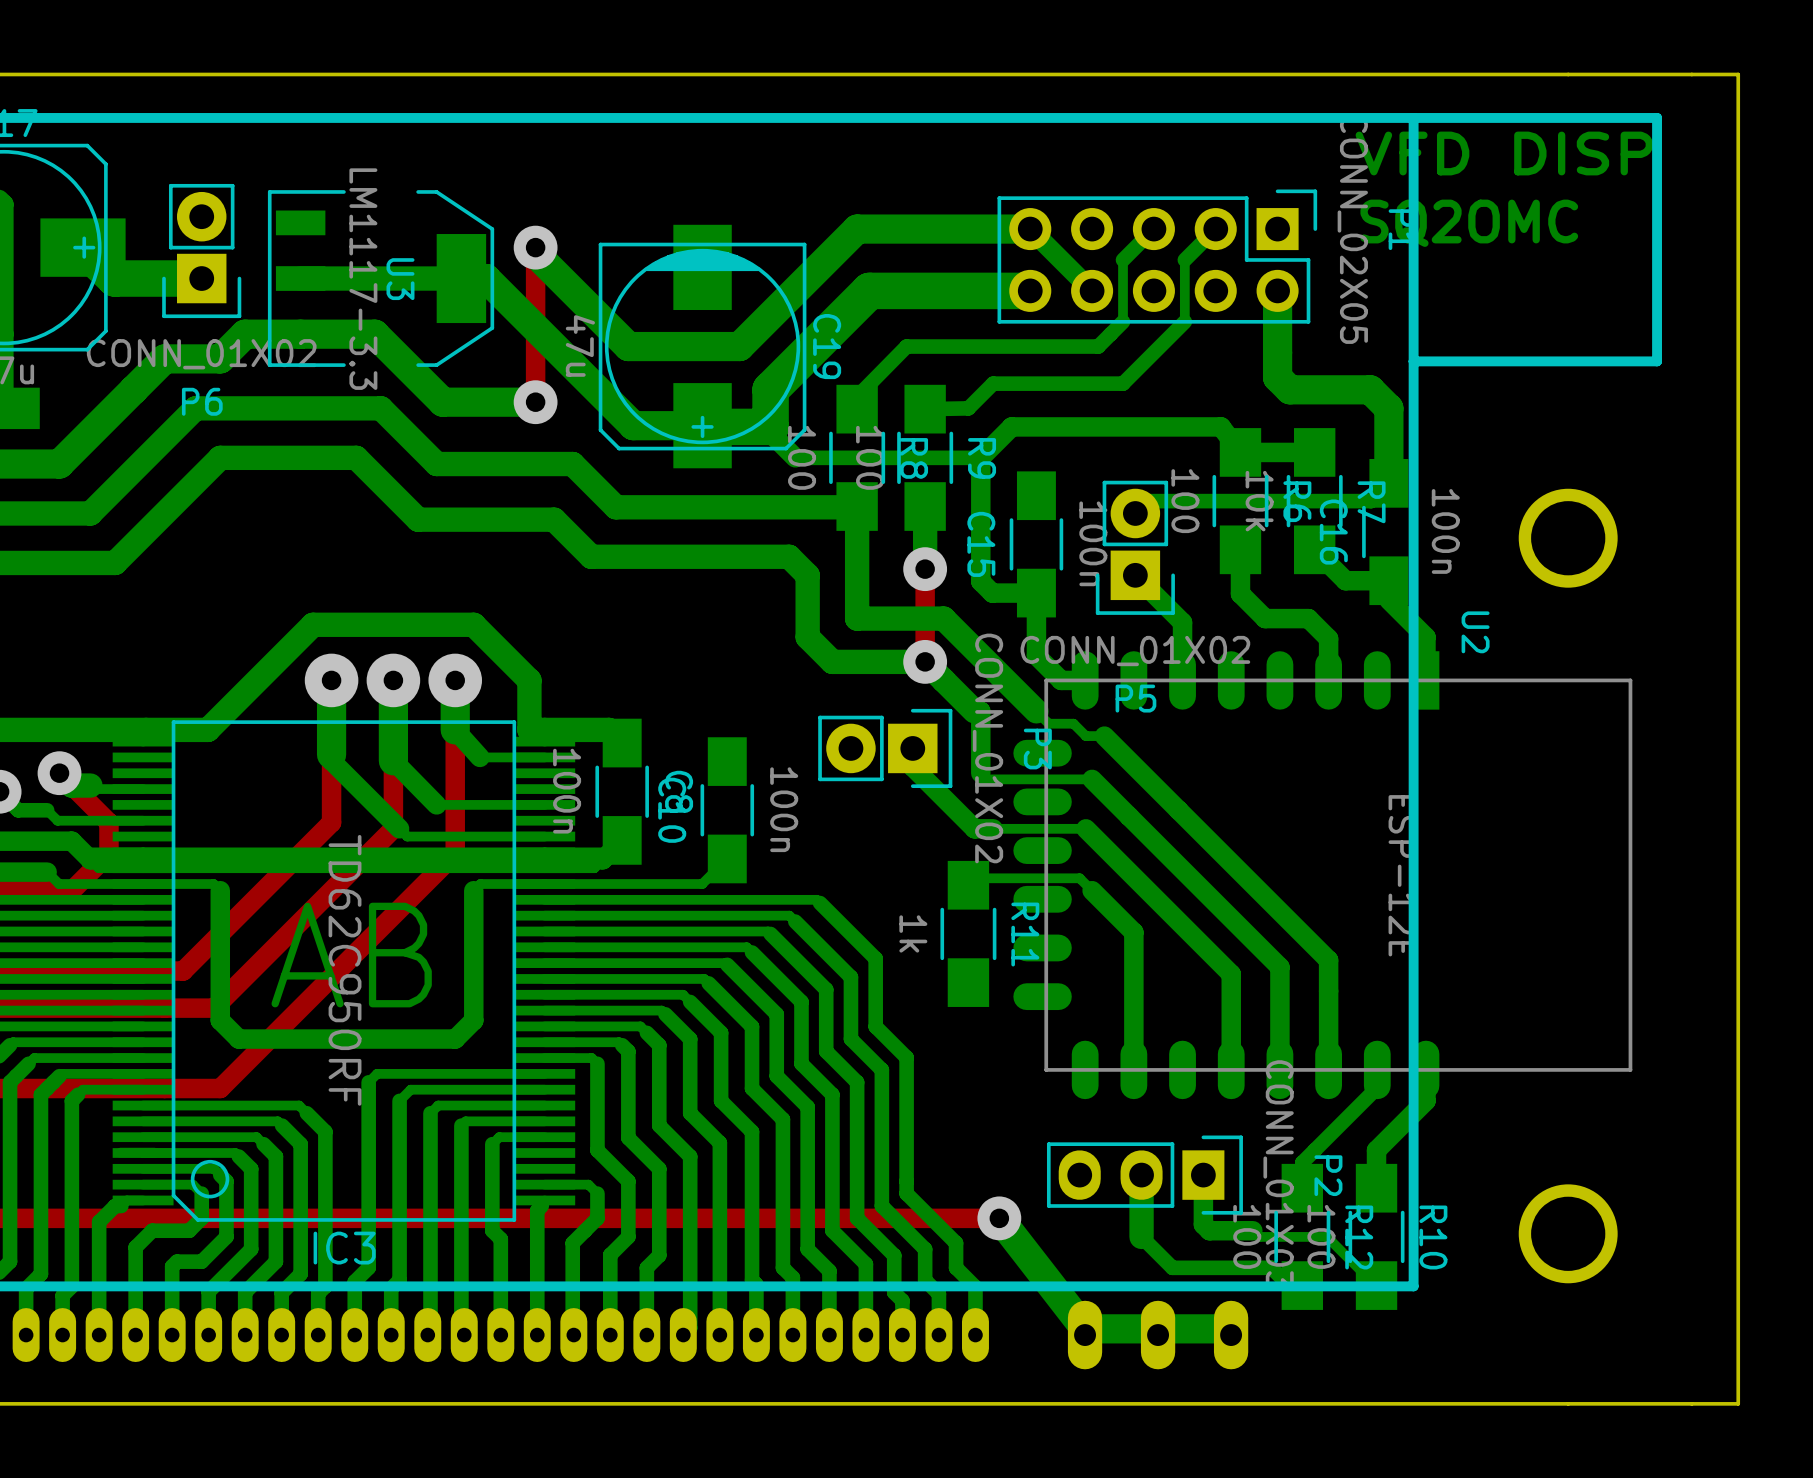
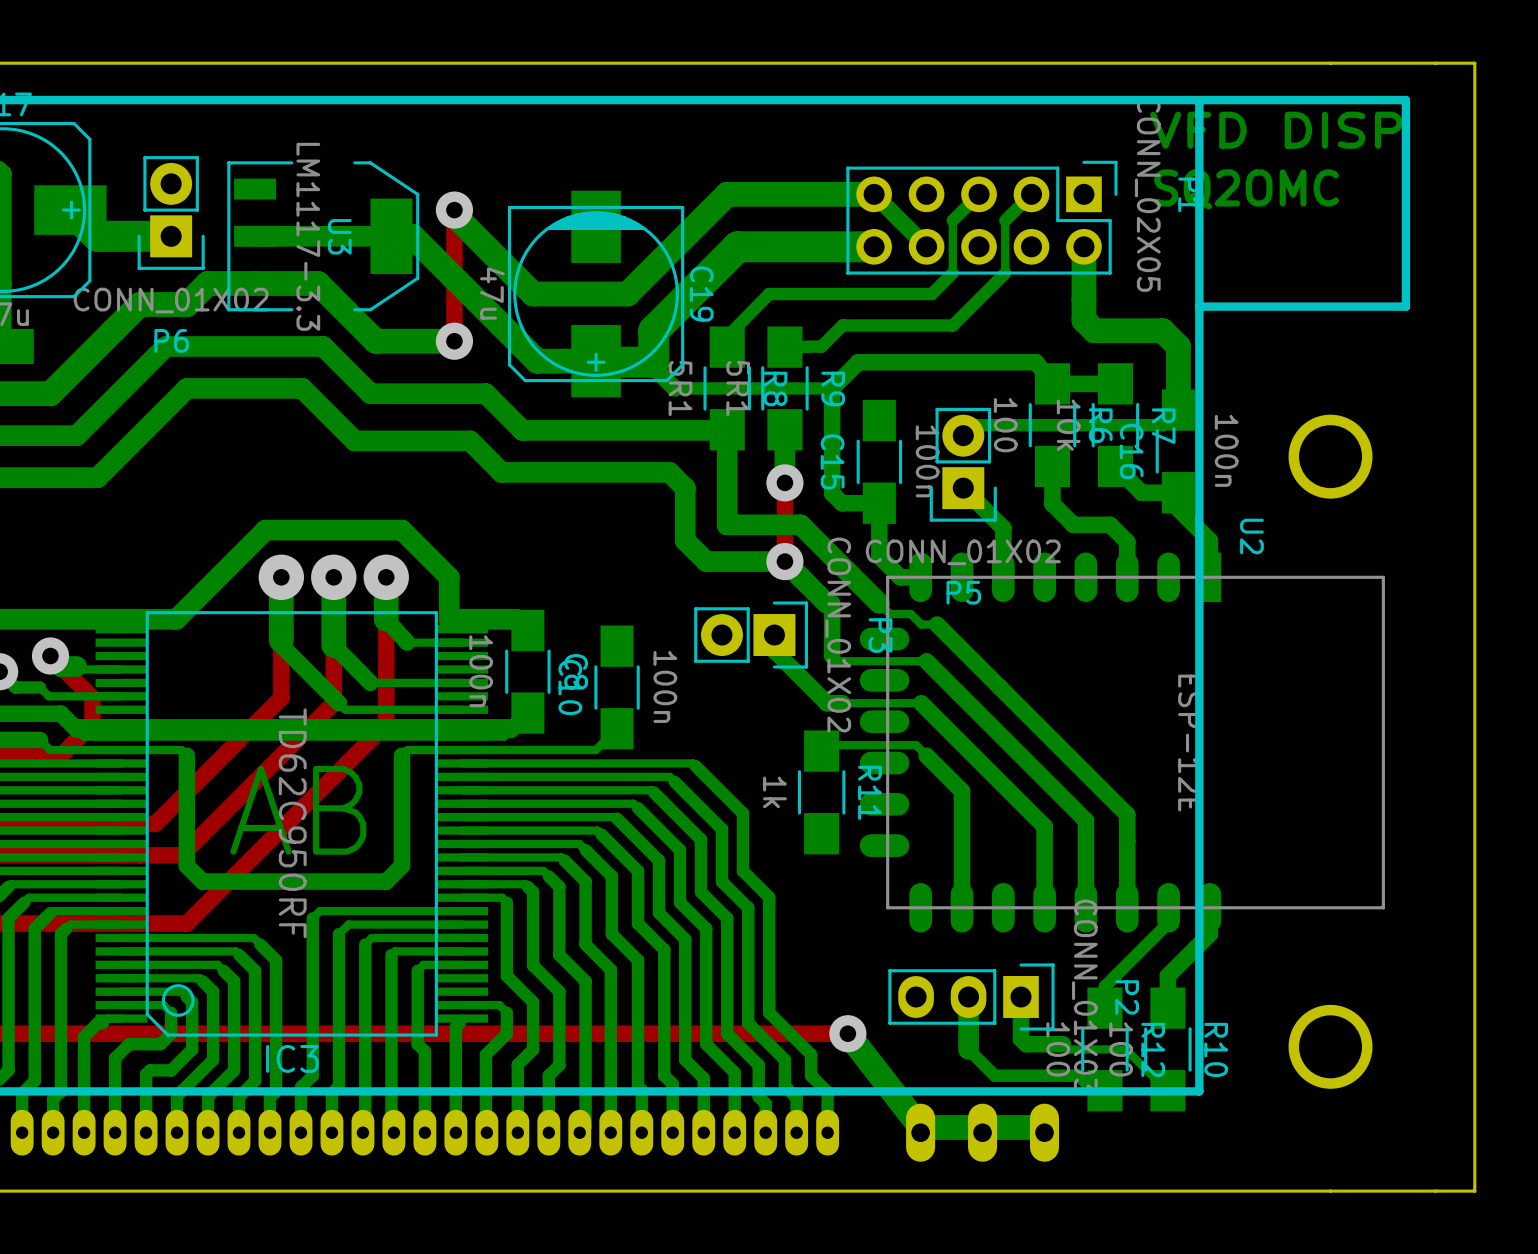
R8 value: 100 (802, 457) -> 5R1 (680, 388)
R9 value: 100 (870, 457) -> 5R1 (738, 388)

